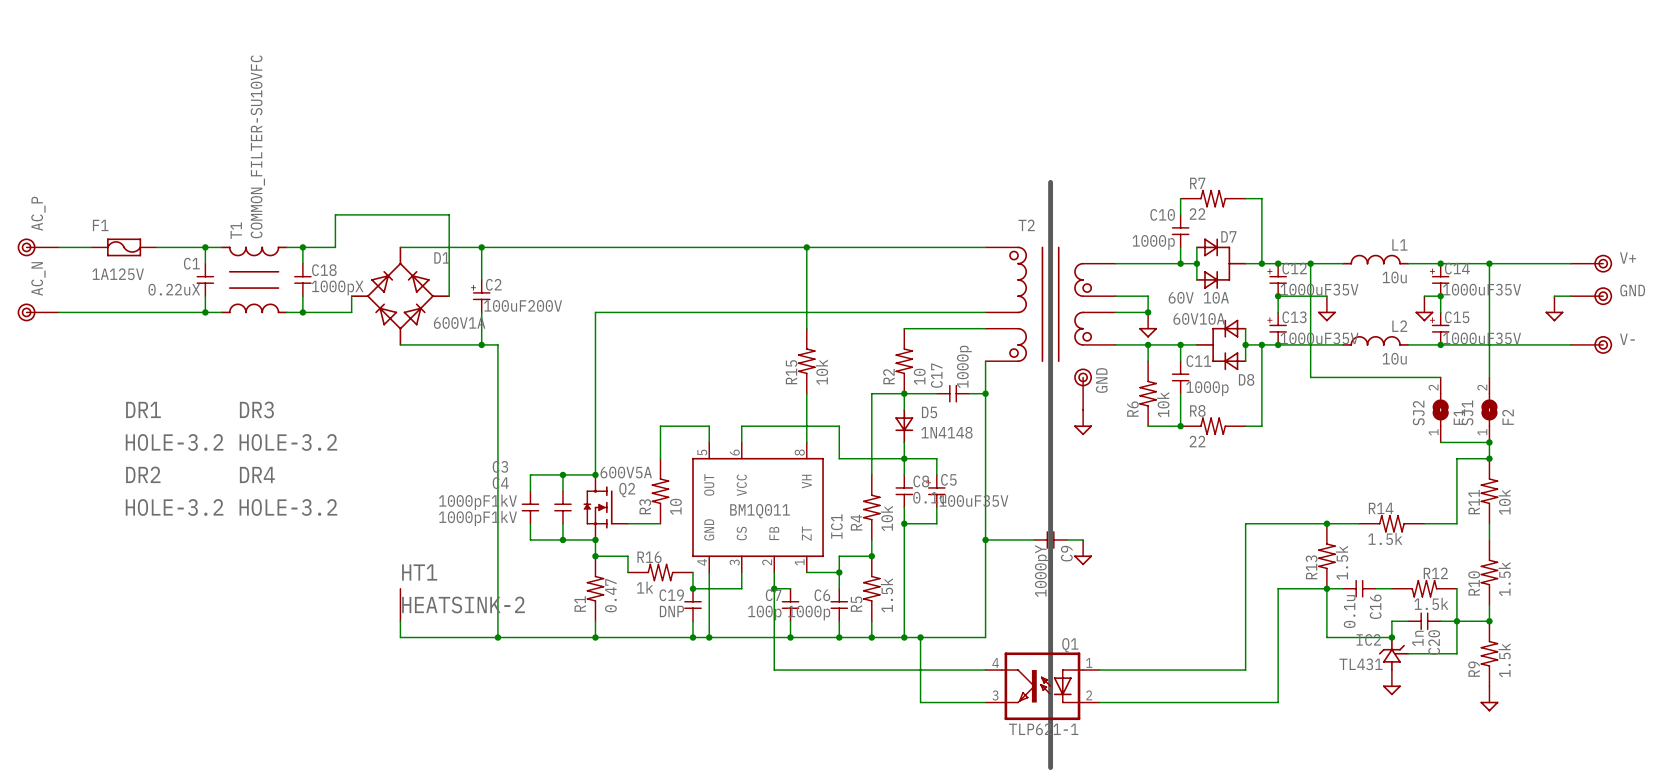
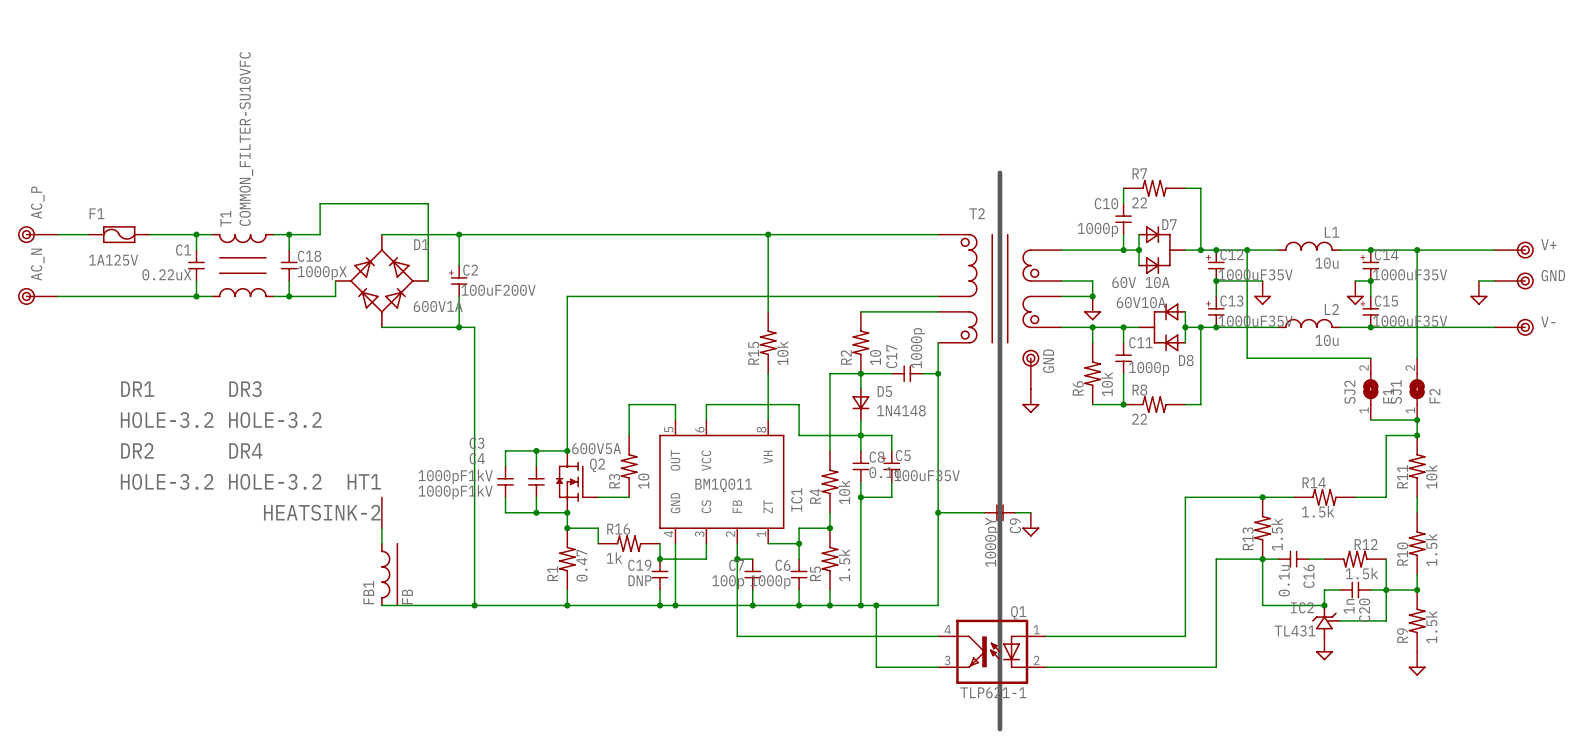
HT1 name position: HT1 (419, 572) -> HT1 (364, 481)
HT1 position: (400, 605) -> (381, 512)
FB1: none -> FB (389, 574)
HT1 value position: HEATSINK-2 (463, 605) -> HEATSINK-2 (322, 512)

